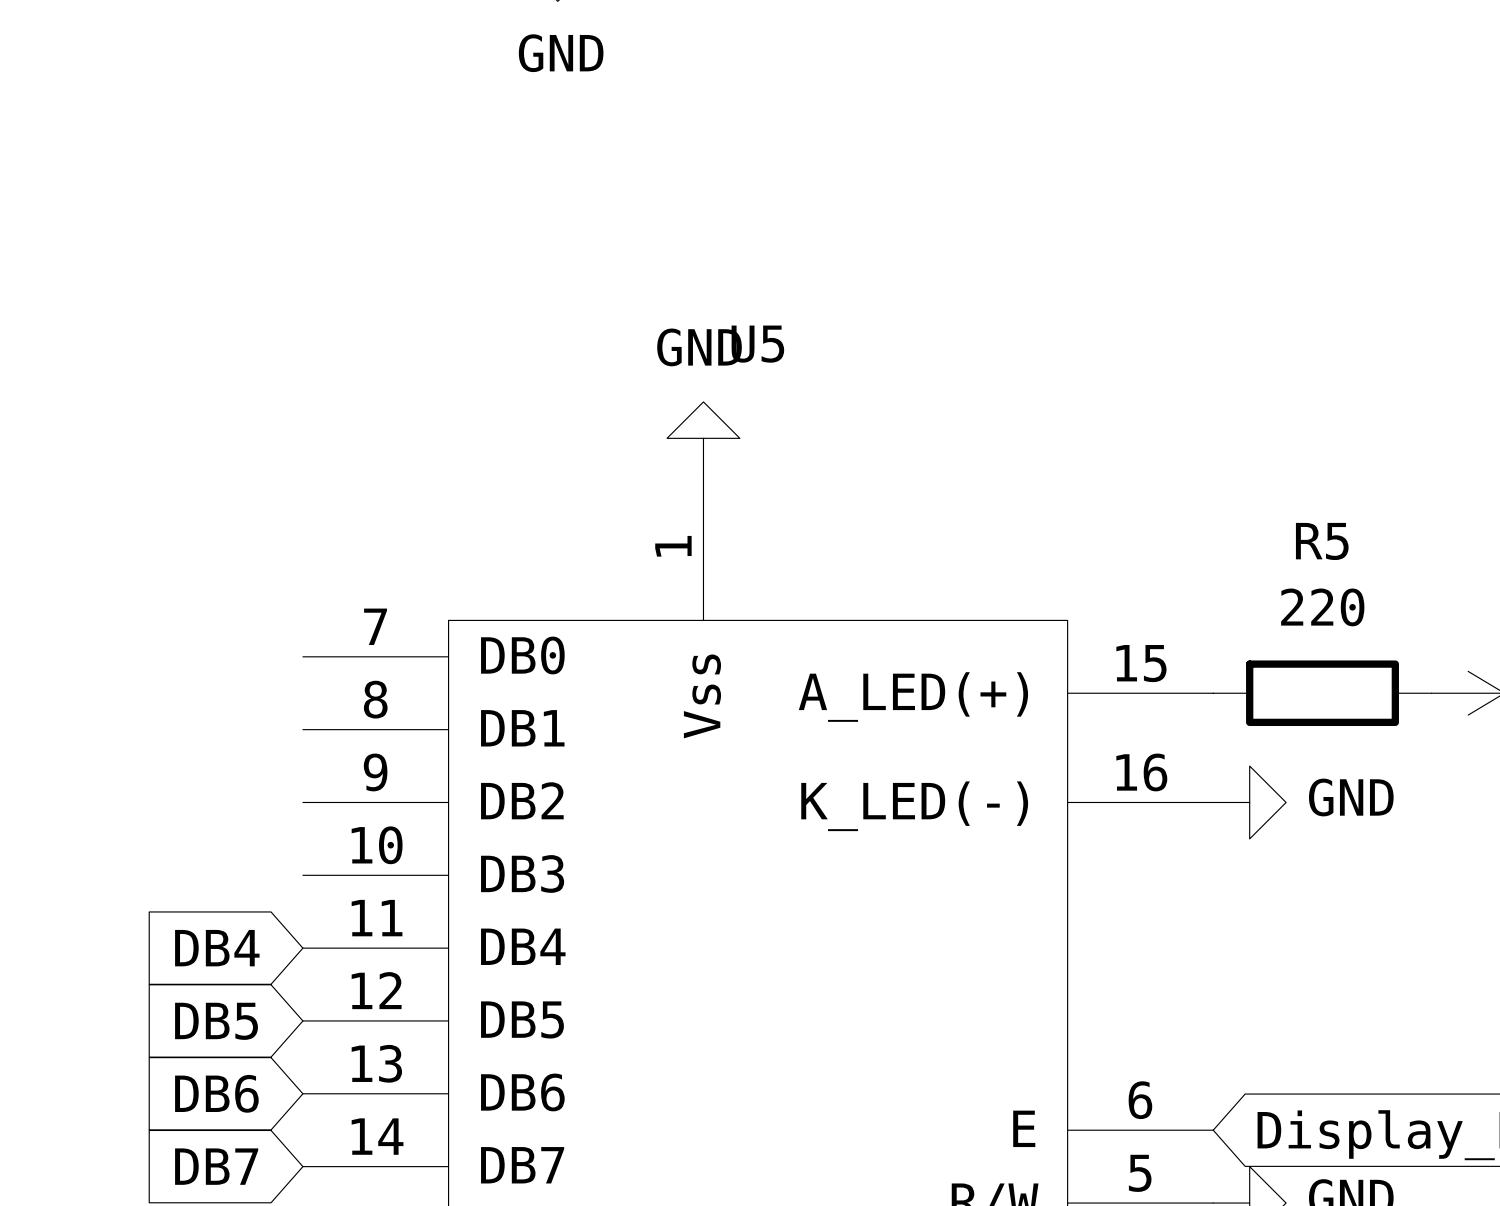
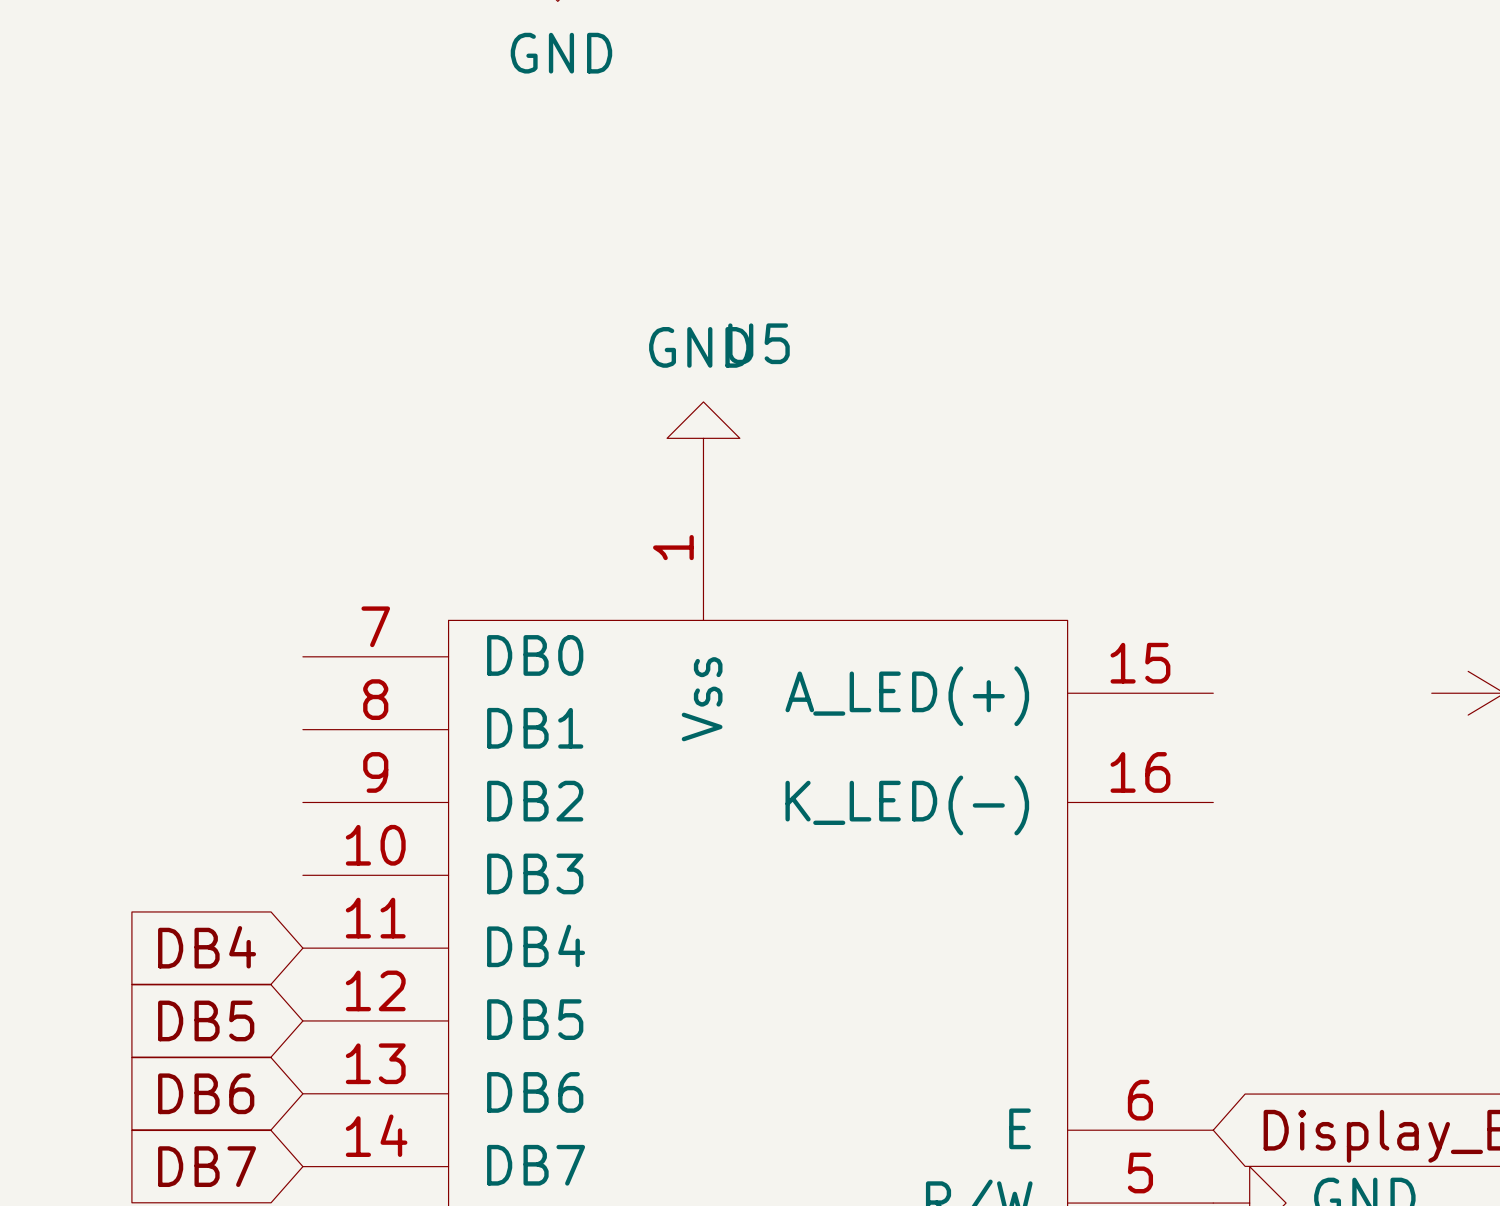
R5: 220 (1322, 693) -> none
power symbol: GND (1249, 802) -> none

